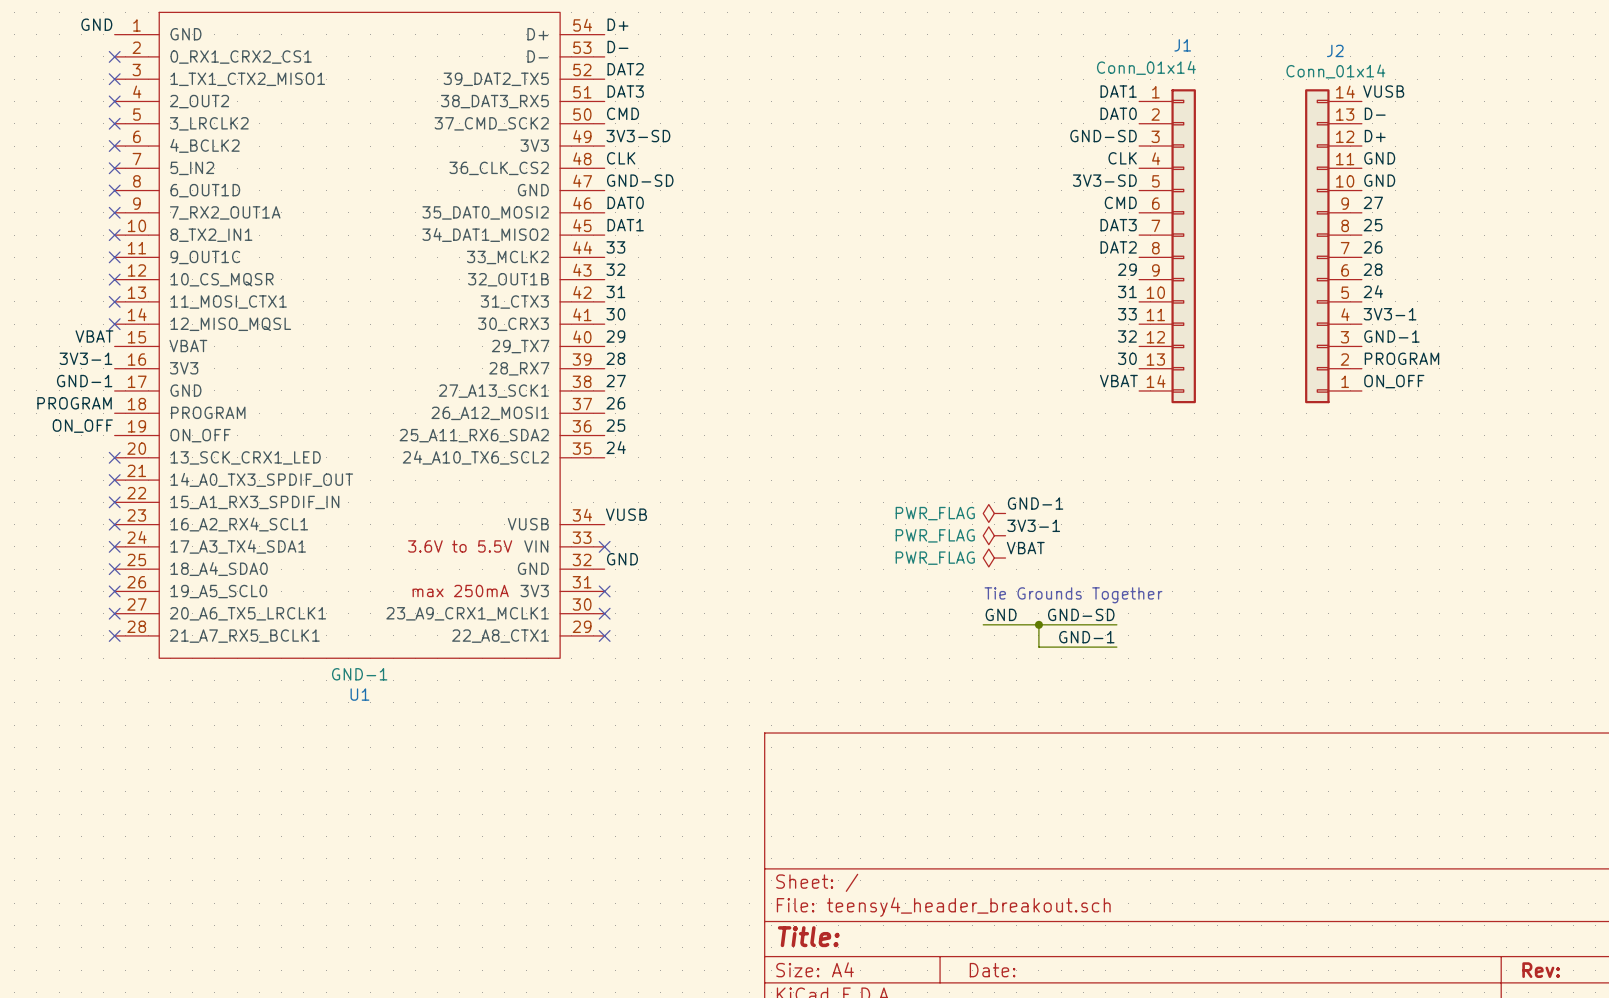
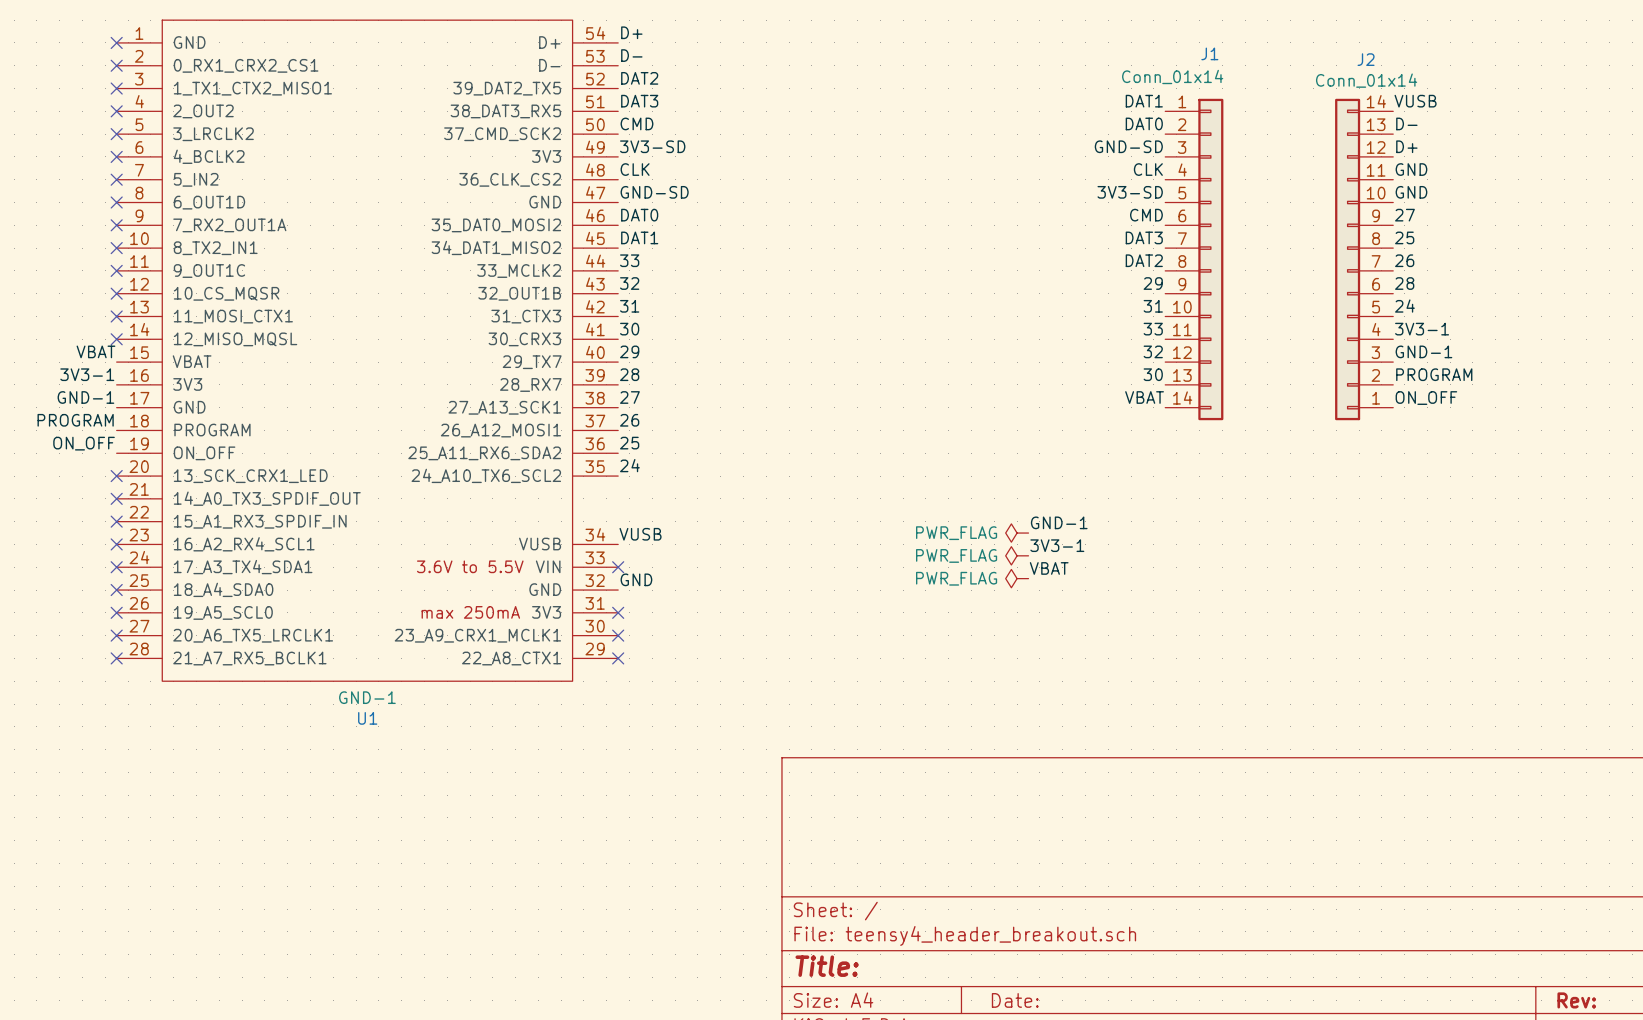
label: GND (96, 24) -> none
no-connect mark: none -> (116, 42)
text: Tie Grounds Together (1073, 595) -> none
label: GND (1001, 614) -> none
label: GND-SD (1081, 614) -> none
wire: (983, 624) (1116, 624) -> none
wire: (1038, 624) (1038, 647) (1116, 647) -> none
junction: (1038, 624) -> none
label: GND-1 (1086, 637) -> none

